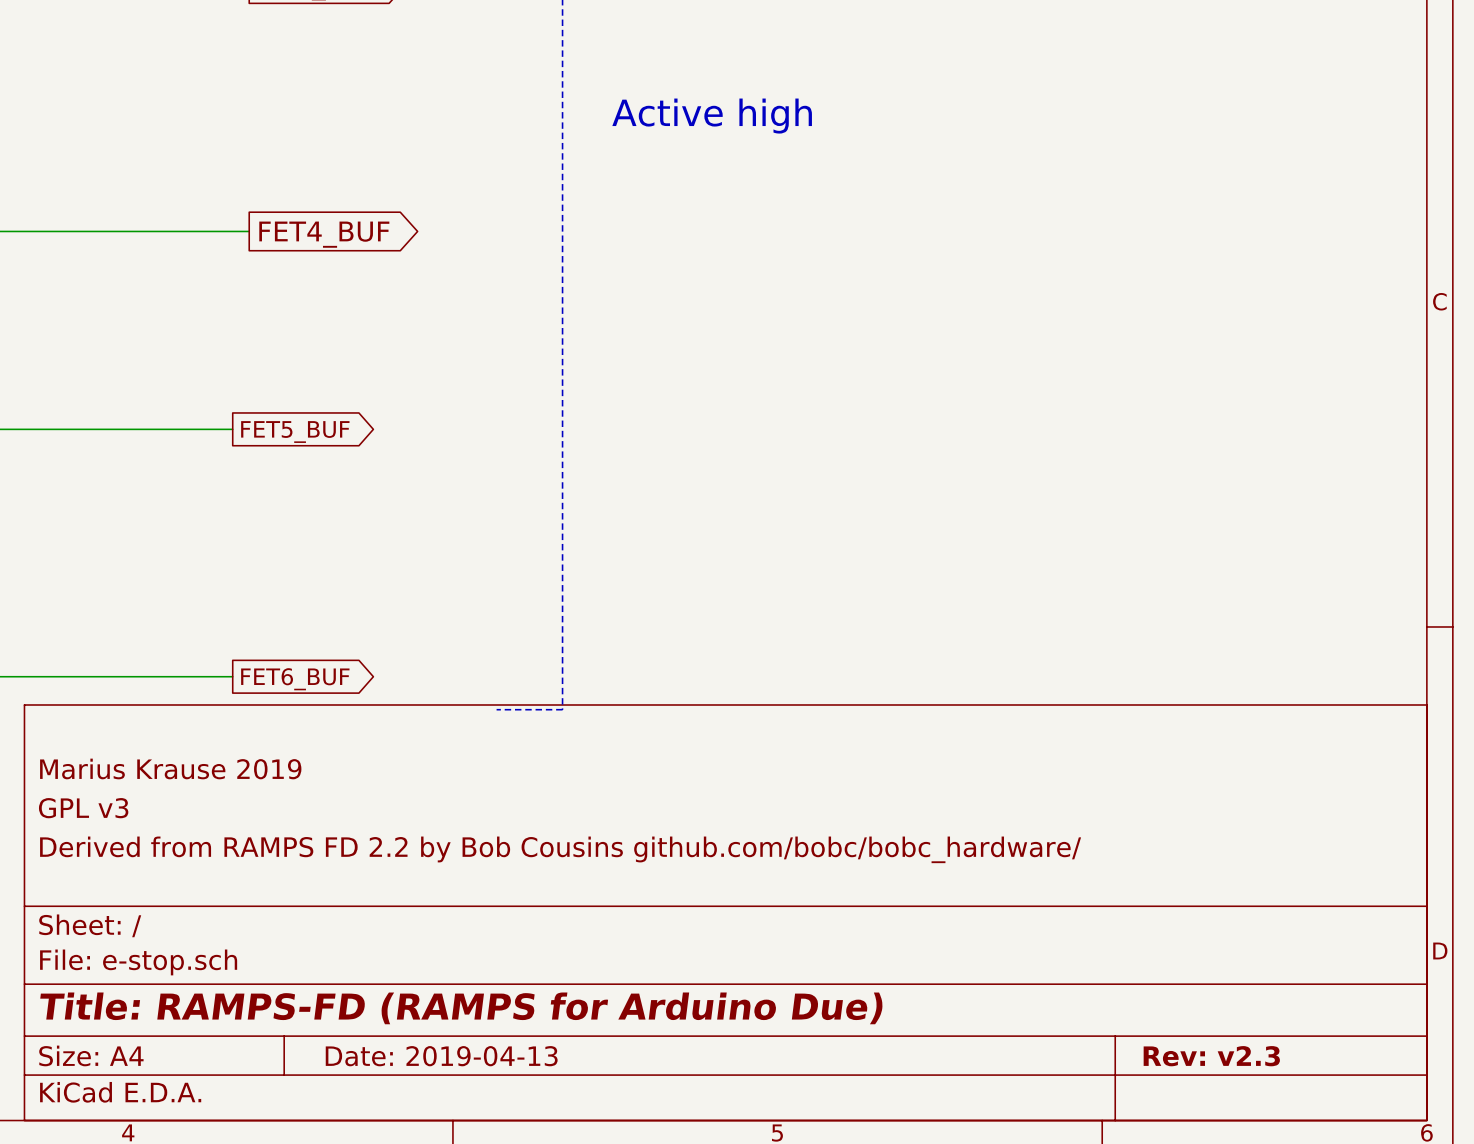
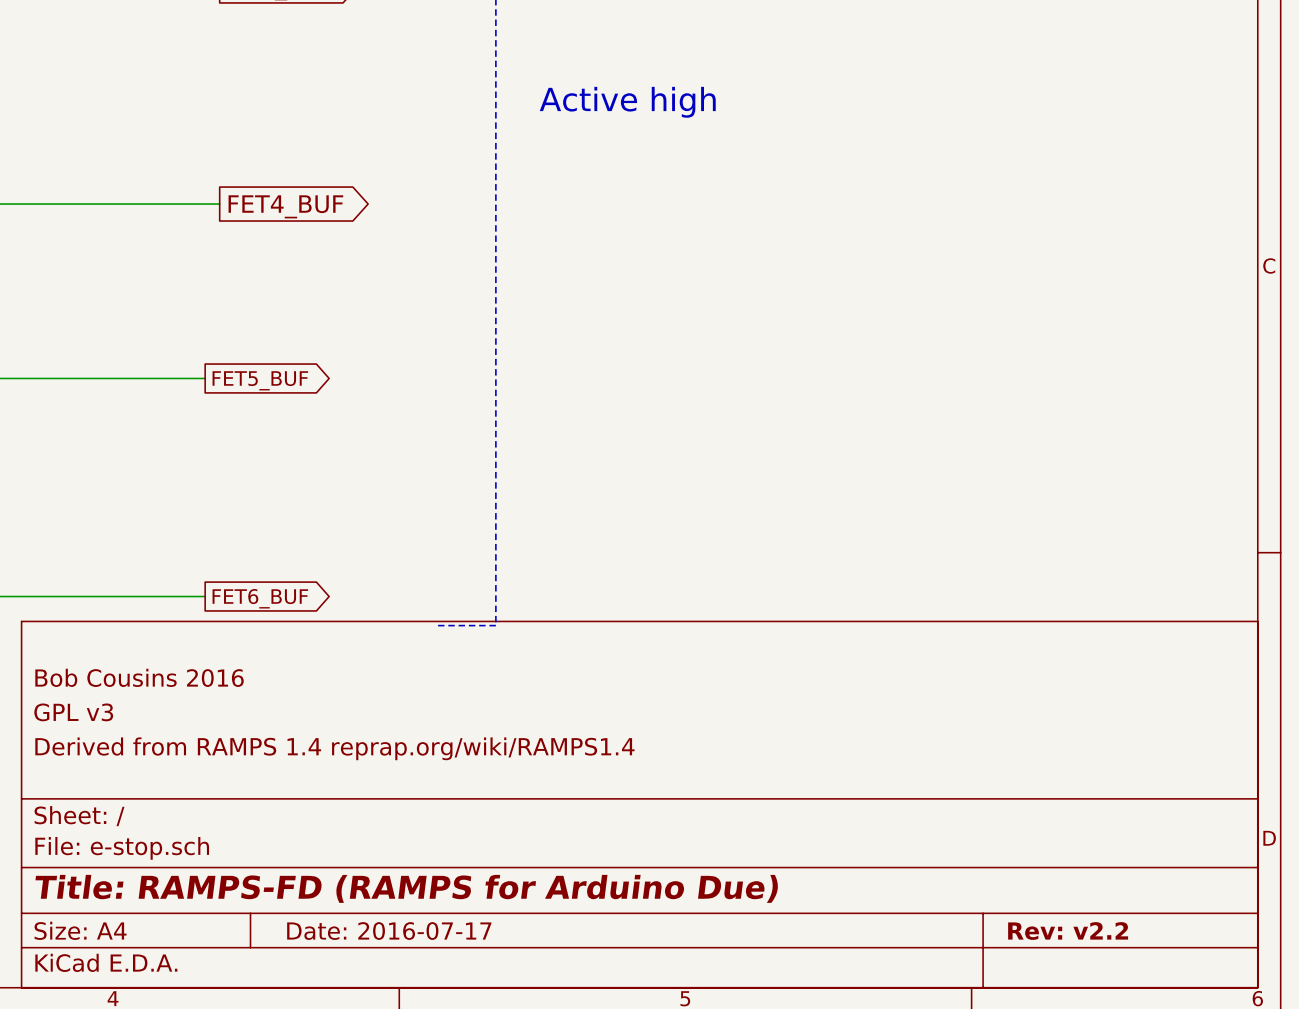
title block: Marius Krause 2019 (170, 768) -> Bob Cousins 2016 (139, 677)
title block: Derived from RAMPS FD 2.2 by Bob Cousins github.com/bobc/bobc_hardware/ (560, 849) -> Derived from RAMPS 1.4 reprap.org/wiki/RAMPS1.4 (334, 748)
title block: Date: 2019-04-13 (441, 1056) -> Date: 2016-07-17 (389, 931)
title block: Rev: v2.3 (1211, 1056) -> Rev: v2.2 (1068, 931)

